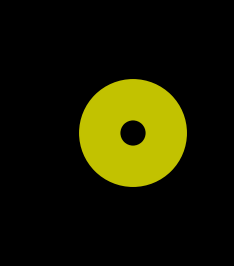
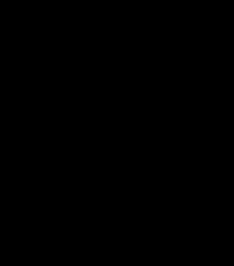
part: (133, 133) -> none

